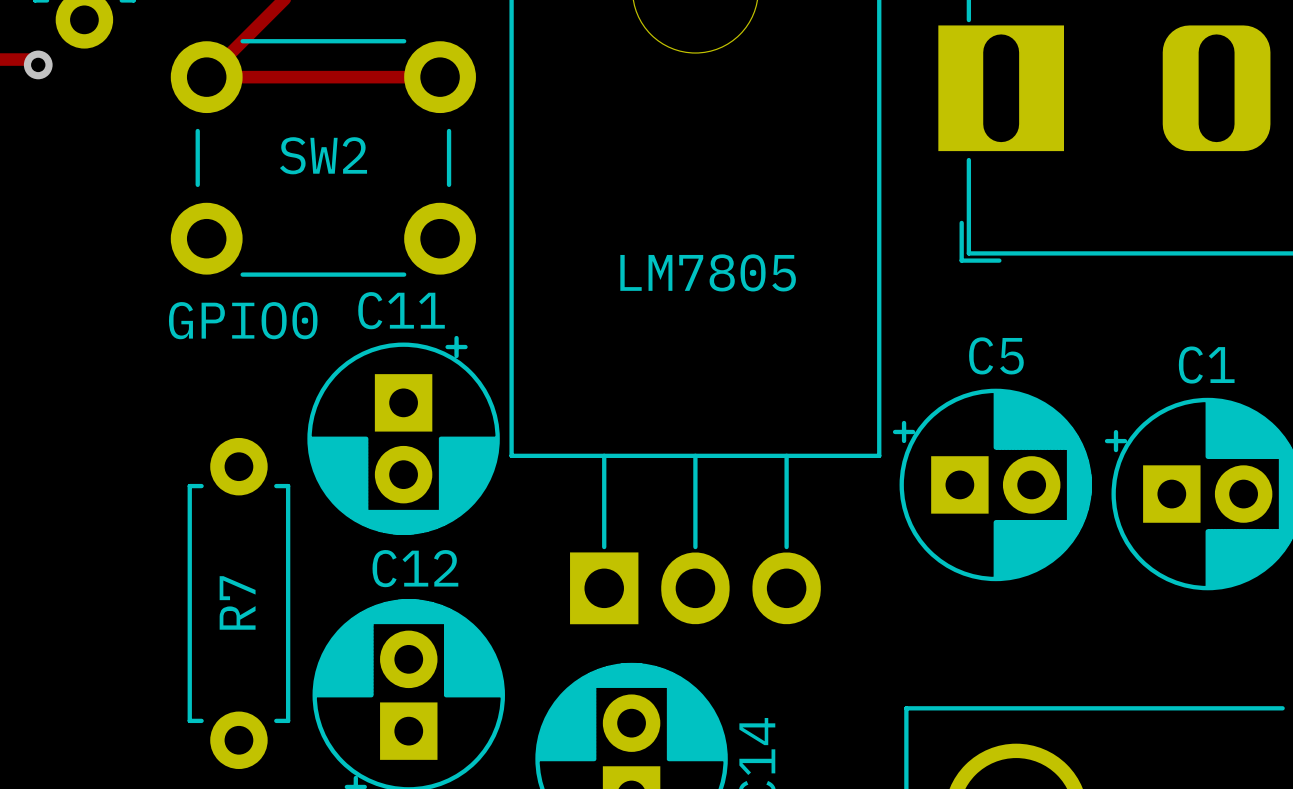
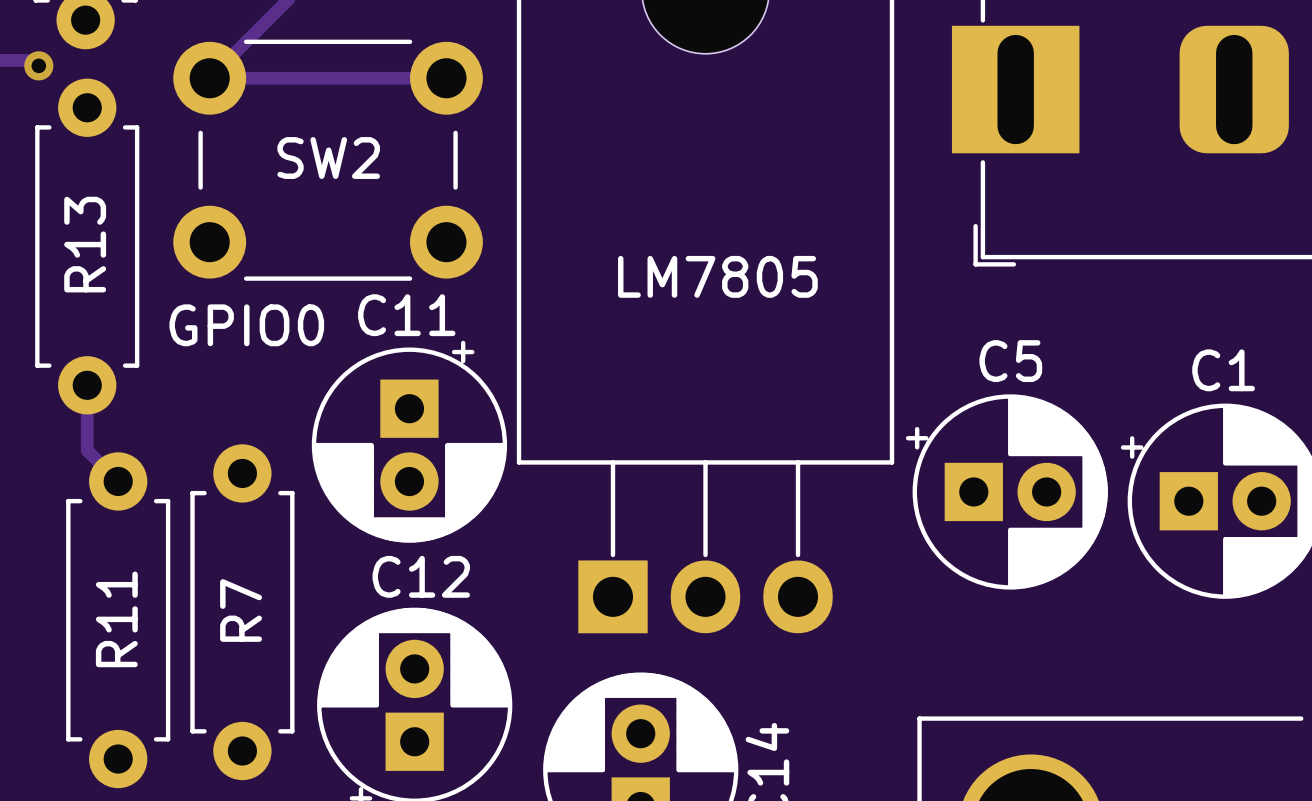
R13: none -> (87, 246)
track: none -> (87, 385) (87, 450) (118, 481)
R11: none -> (118, 620)

